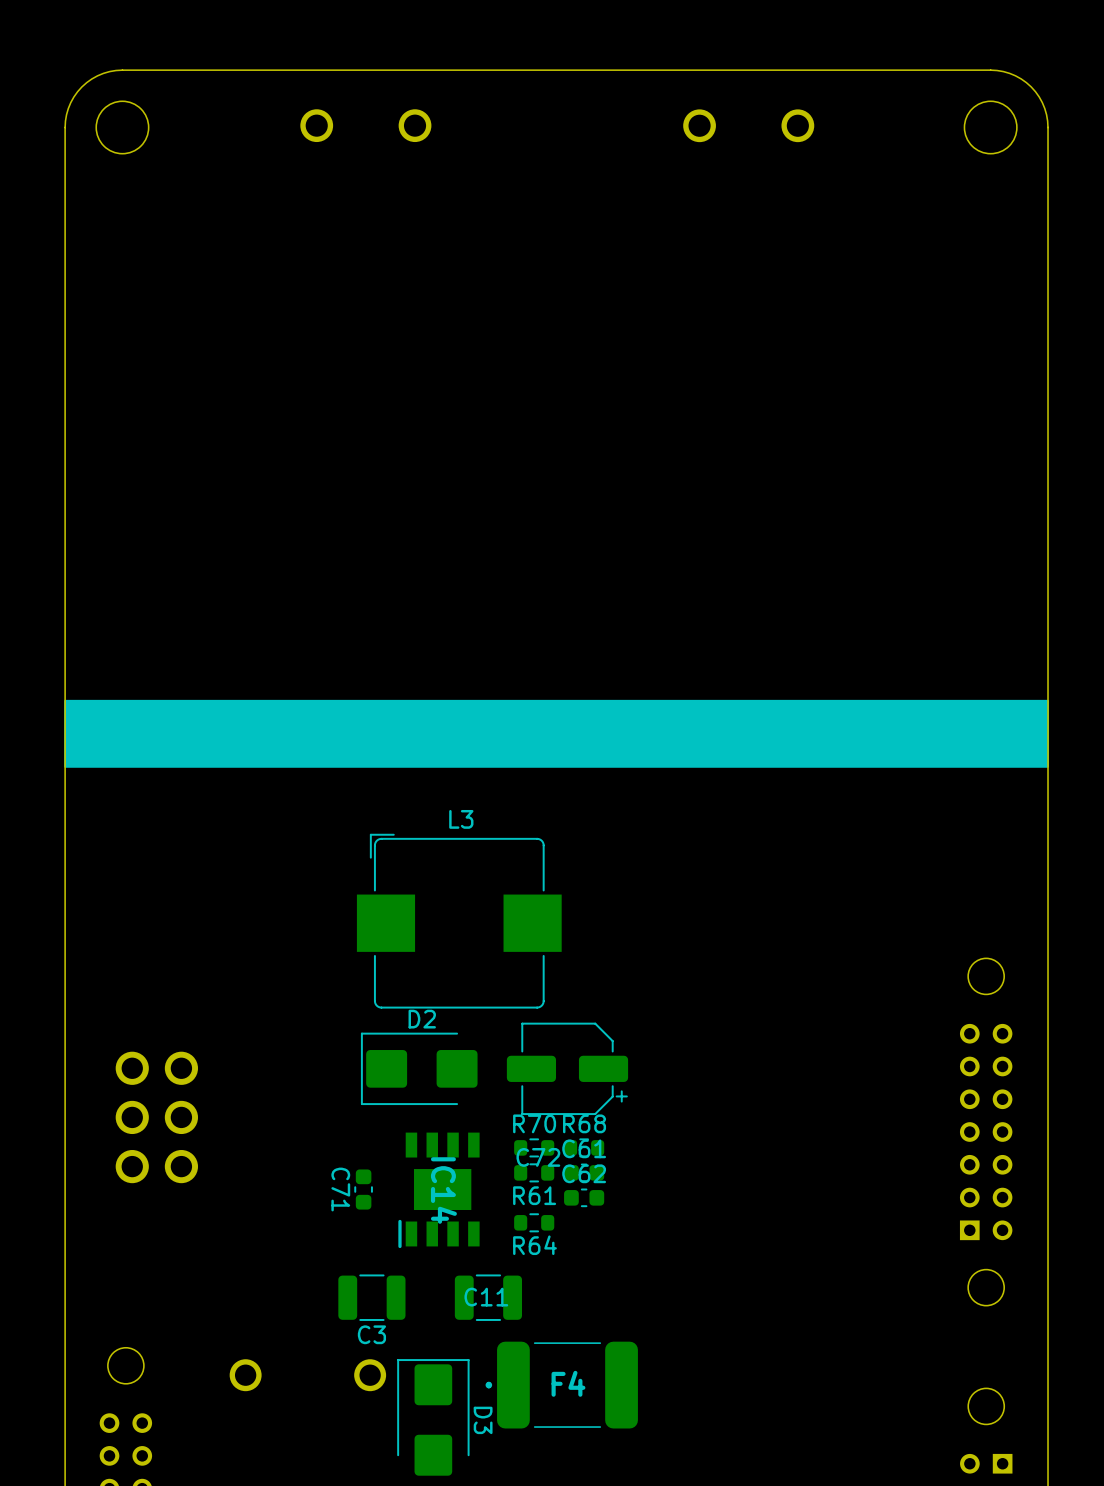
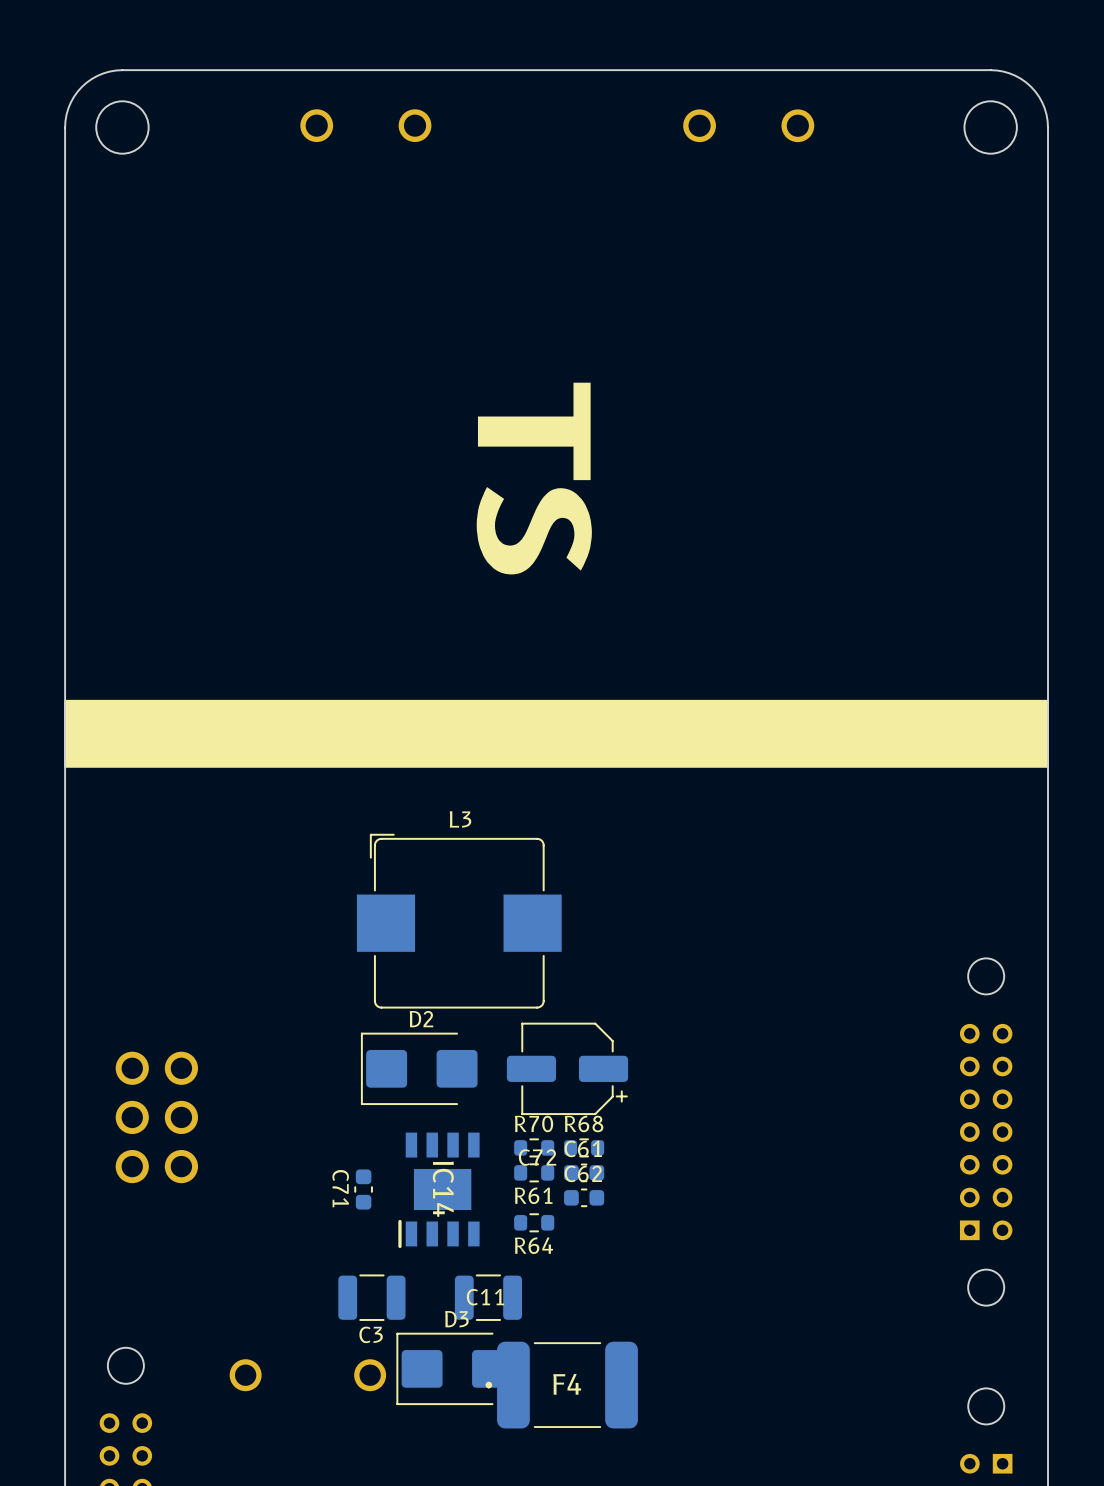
text: none -> TS (534, 478)
D3 rotation: 0° (433, 1417) -> 90° counterclockwise (454, 1368)

